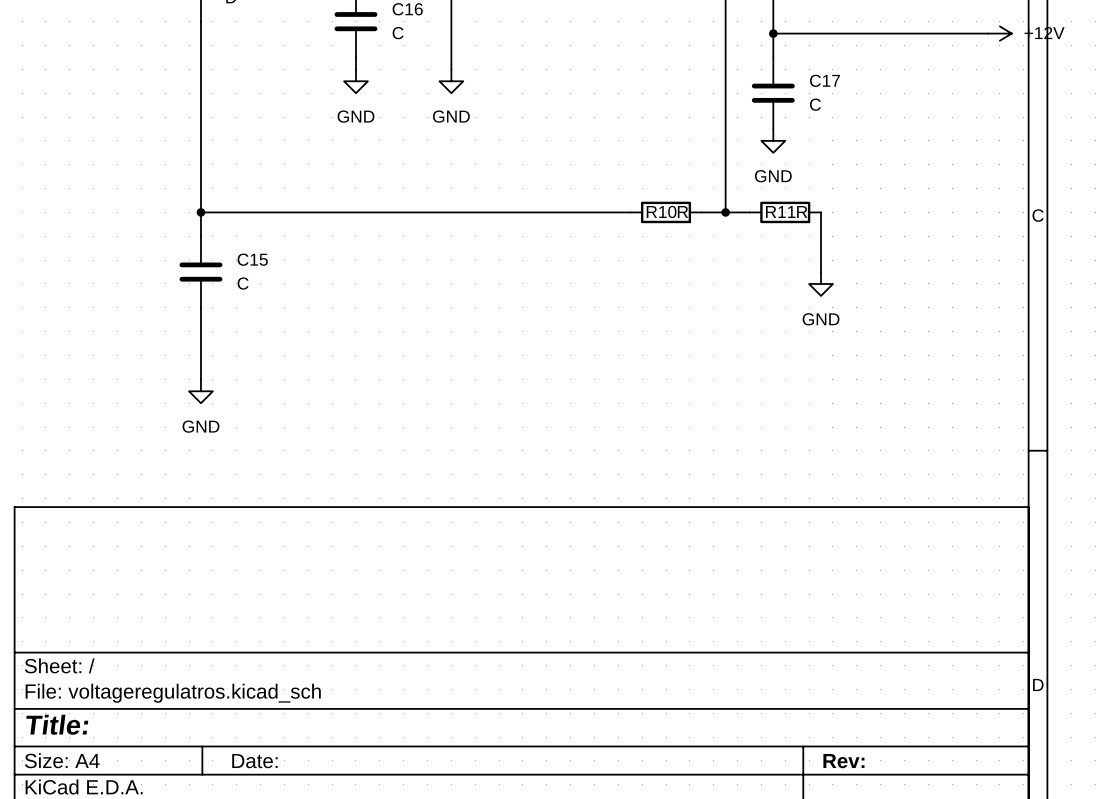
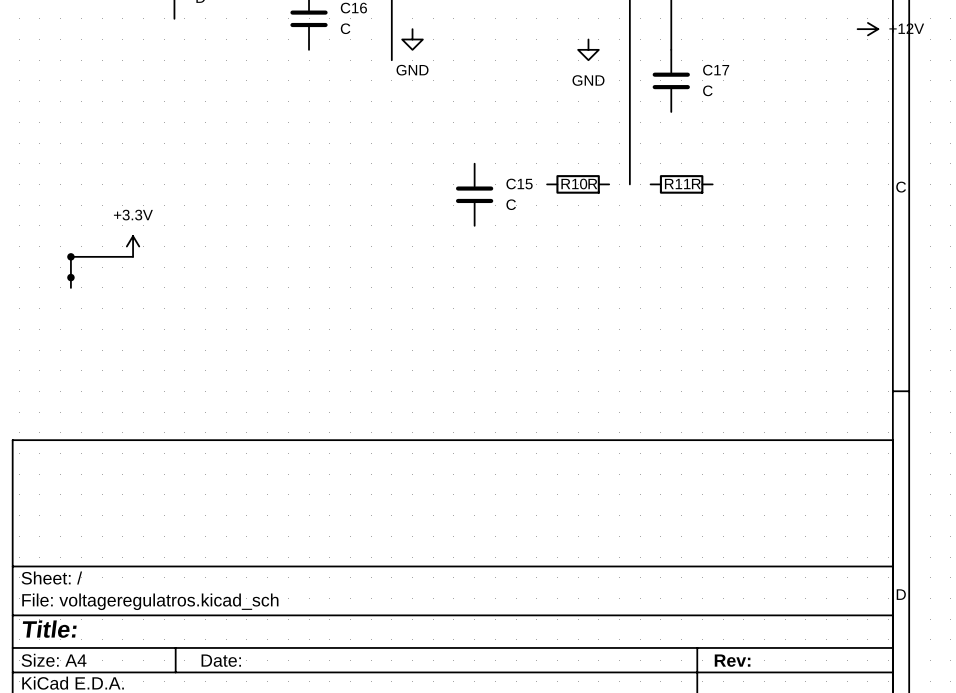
wire: (200, 21) (200, 236) -> none
wire: (773, 33) (987, 33) -> none
junction: (773, 33) -> none
wire: (355, 57) (355, 69) -> none
power symbol: none -> GND (588, 49)
power symbol: GND (355, 81) -> none
power symbol position: GND (451, 81) -> GND (412, 39)
power symbol: GND (773, 140) -> none
wire: (200, 212) (630, 212) -> none
junction: (200, 212) -> none
wire: (701, 212) (749, 212) -> none
junction: (725, 212) -> none
wire: (821, 212) (821, 272) -> none
C15 position: (200, 272) -> (474, 194)
power symbol: none -> +3.3V (133, 246)
power symbol: GND (821, 283) -> none
junction: none -> (70, 256)
wire: none -> (133, 256) (70, 256) (70, 287)
wire: (200, 307) (200, 379) -> none
junction: none -> (70, 277)
power symbol: GND (200, 391) -> none

